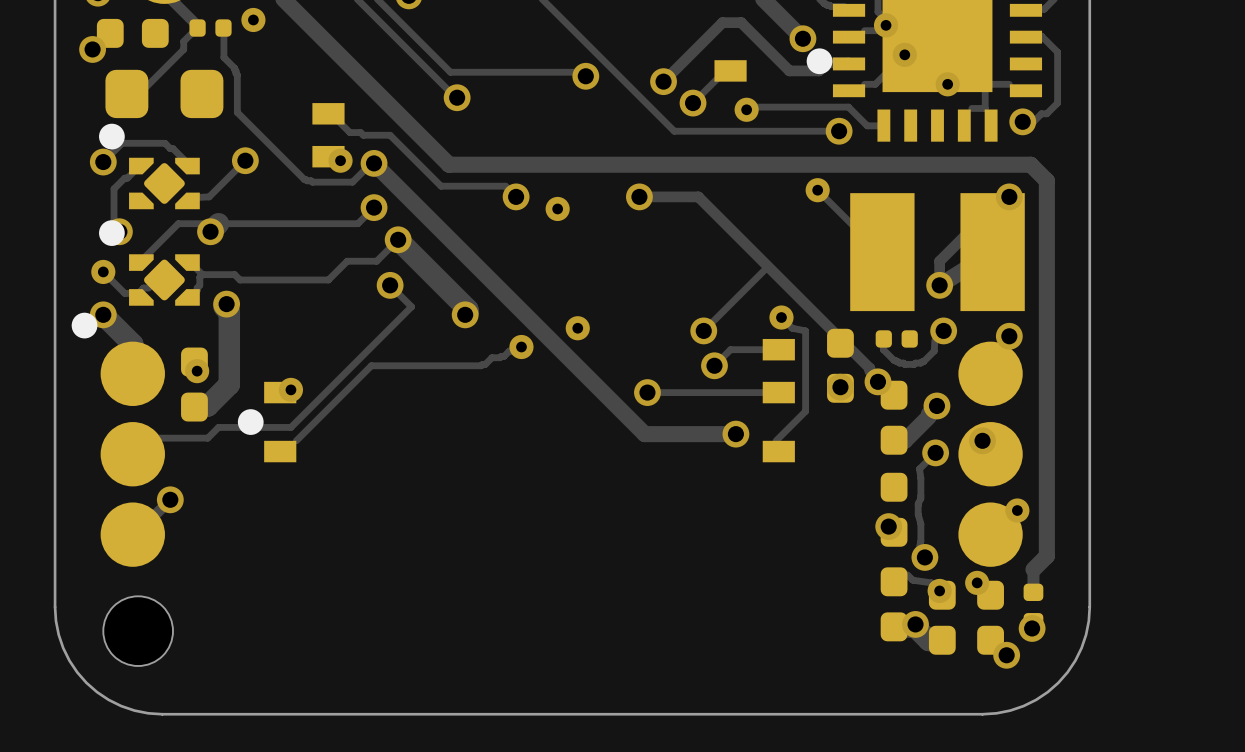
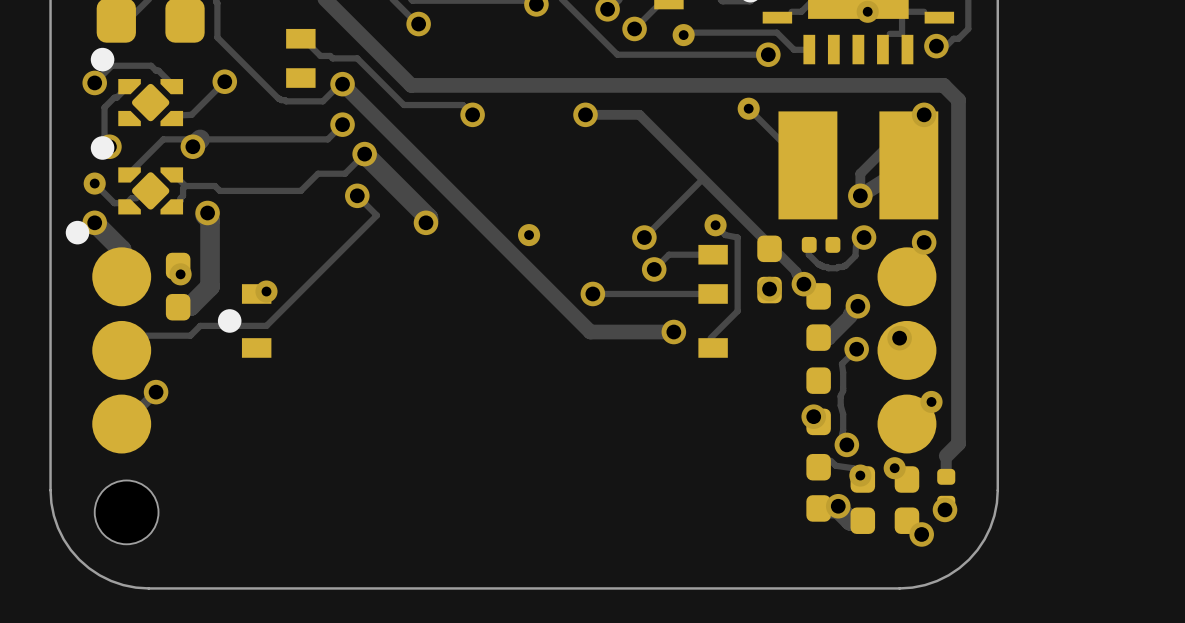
via: (340, 160) -> none
via: (557, 208) -> none
track: (521, 347) (509, 351) (504, 356) (491, 357) (481, 365) (371, 365) (296, 440) -> none
via: (521, 347) -> none

